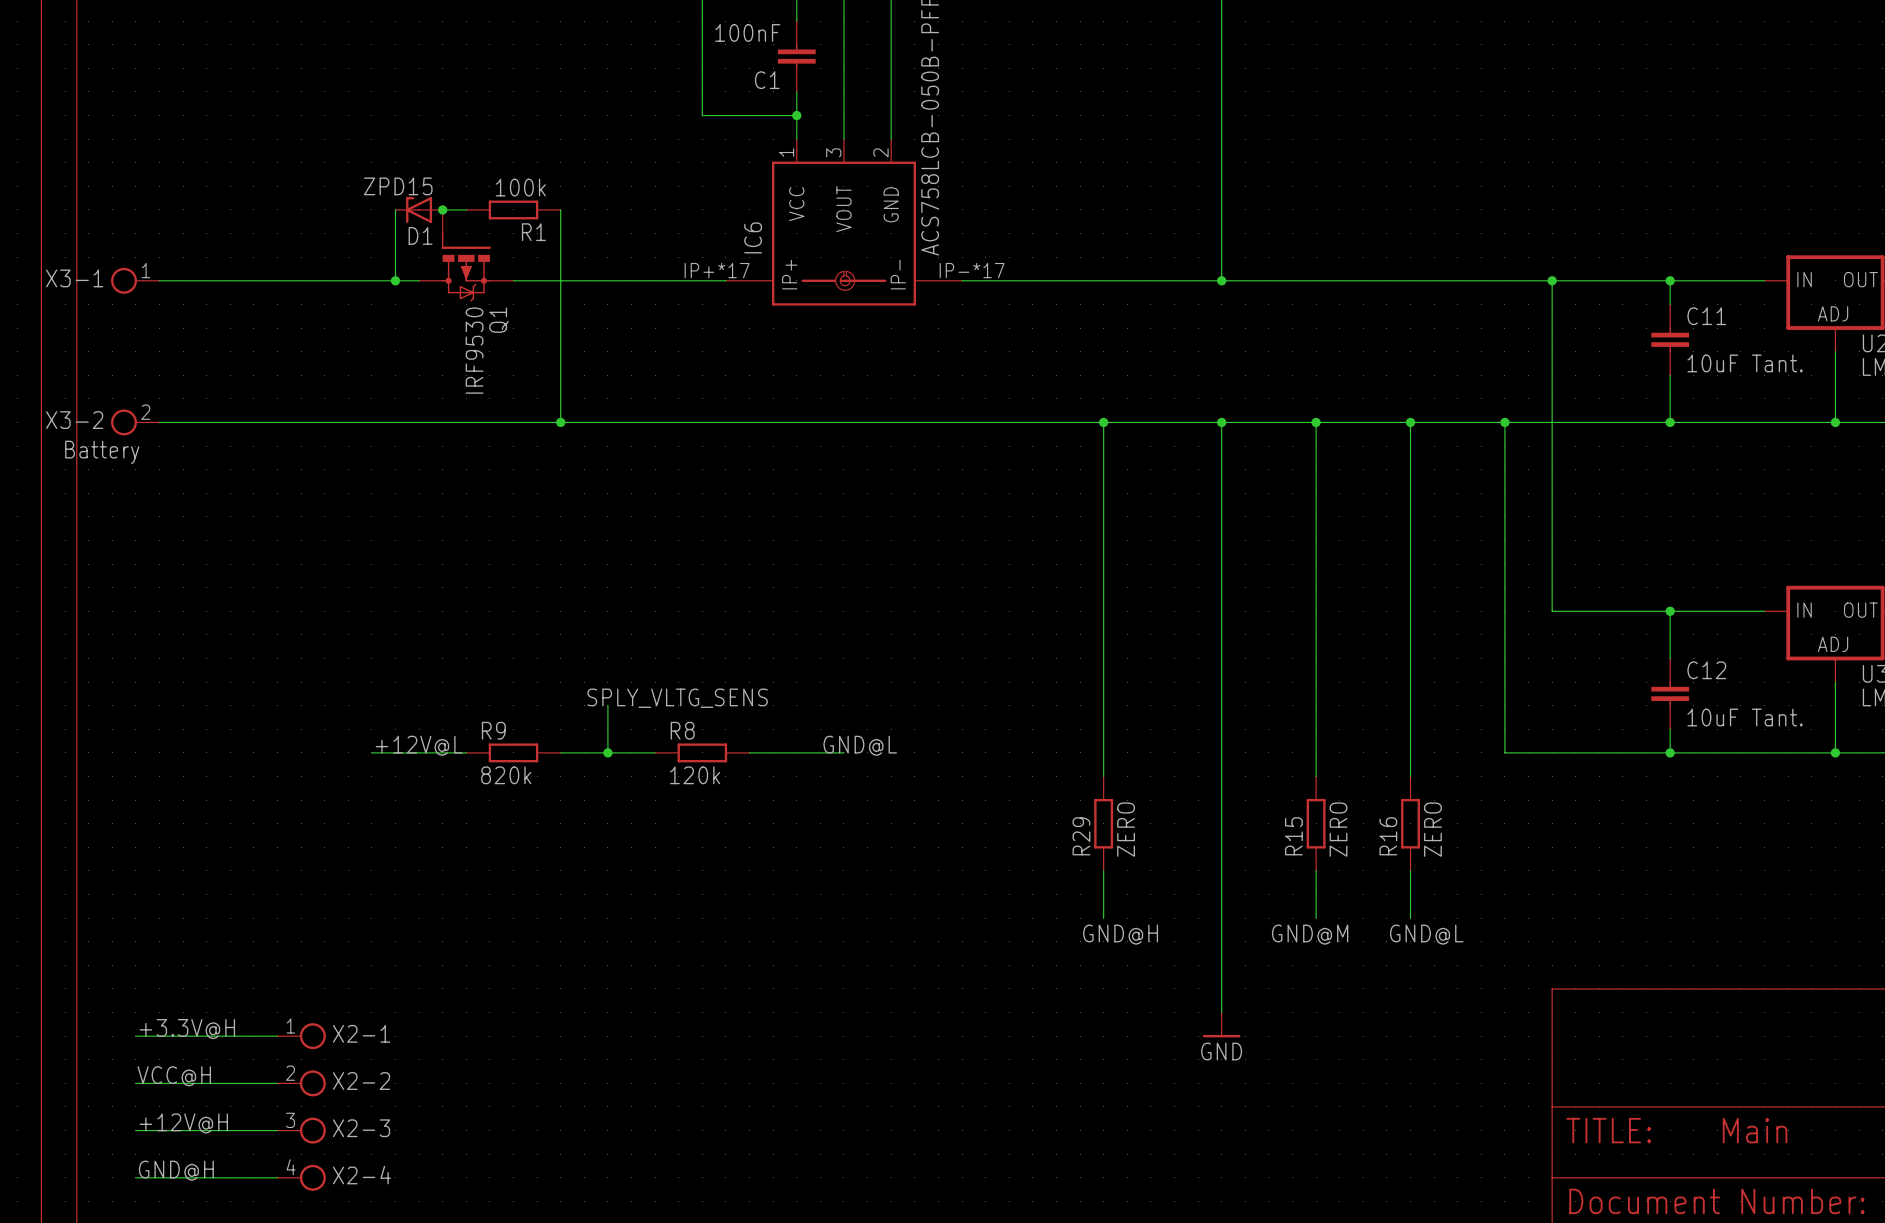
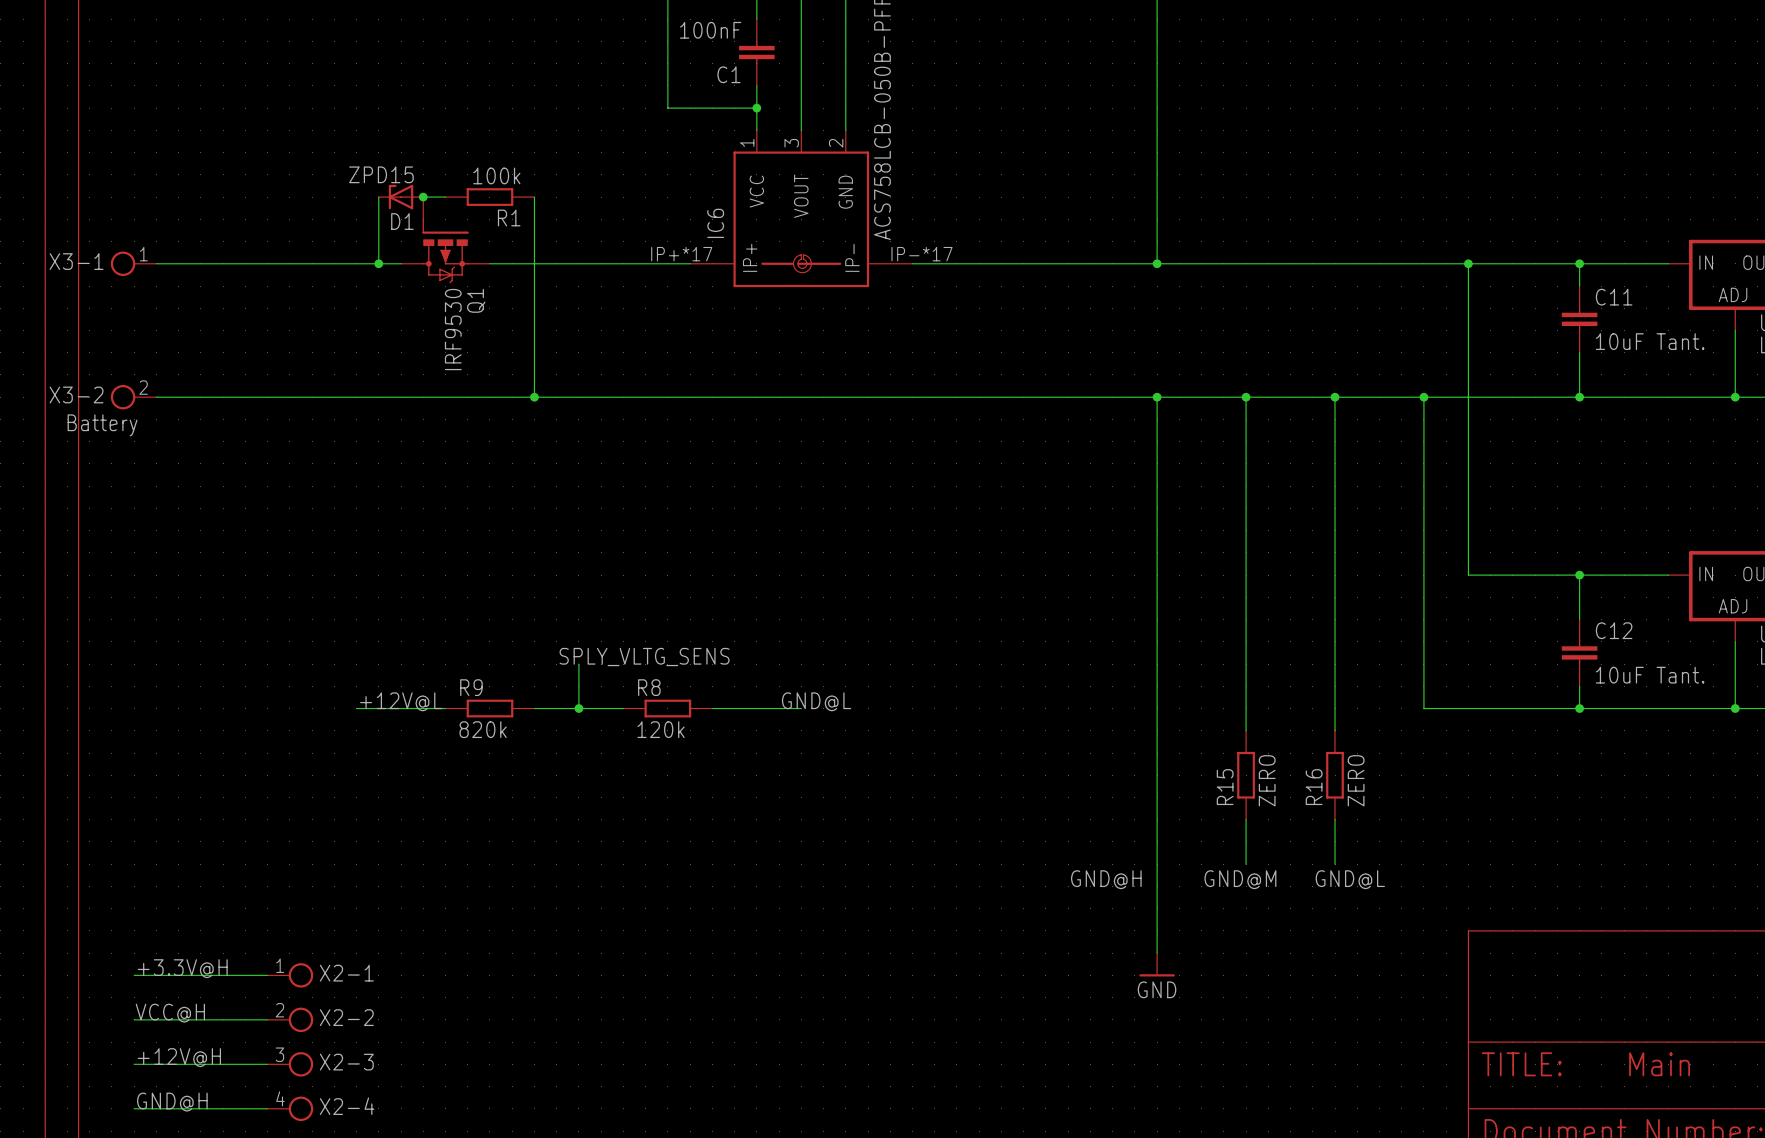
wire: (1103, 422) (1103, 776) -> none
junction: (1103, 422) -> none
R29: ZERO (1103, 823) -> none
wire: (1103, 870) (1103, 918) -> none
label position: GND@H (1120, 934) -> GND@H (1106, 879)

